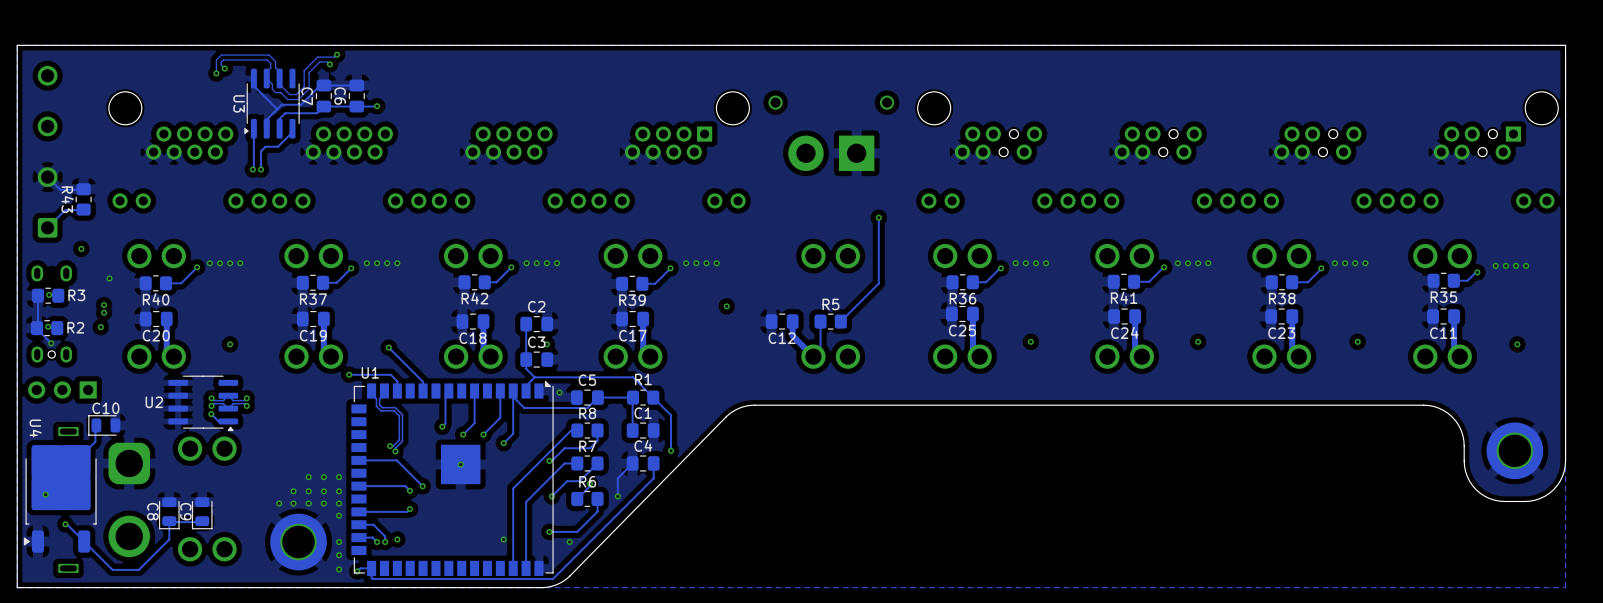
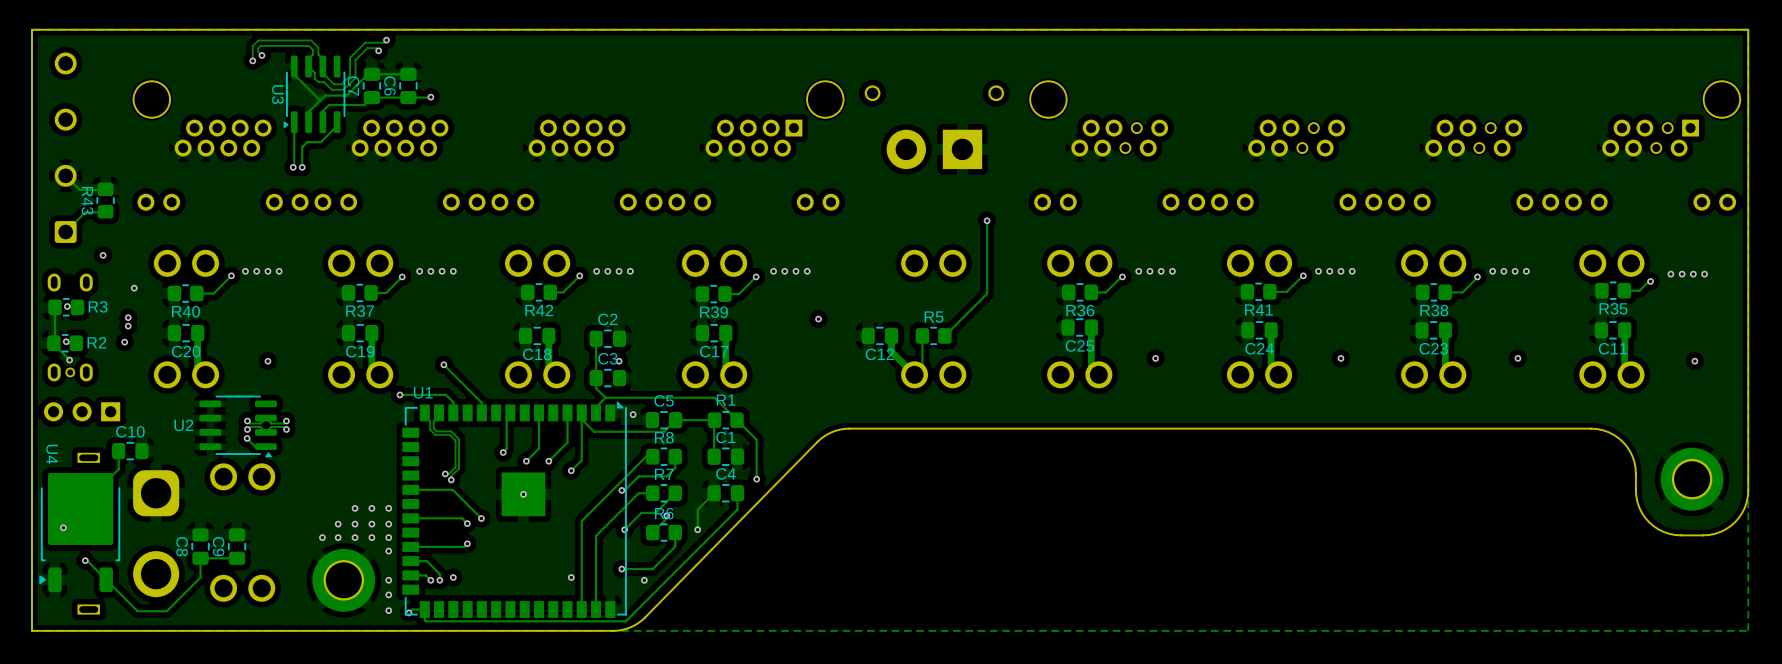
C10 footprint: [88, 415, 121, 436] -> [112, 442, 149, 461]
C8 footprint: [158, 497, 180, 530] -> [191, 528, 210, 565]
C9 footprint: [191, 497, 213, 530] -> [228, 528, 246, 565]

